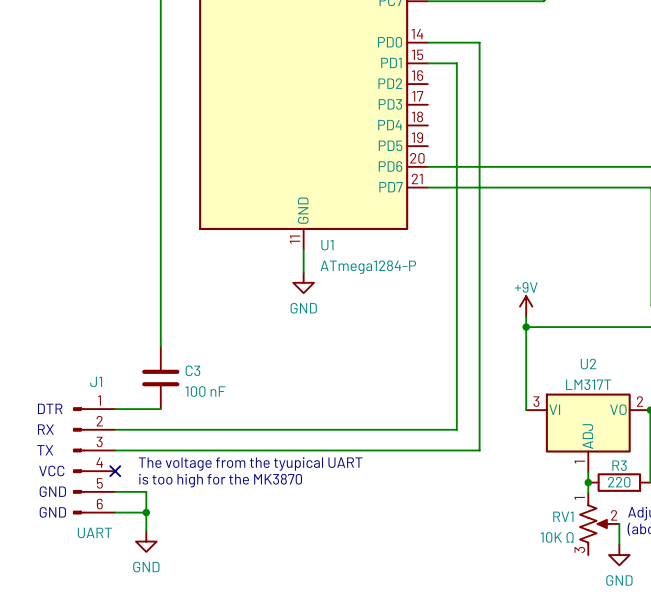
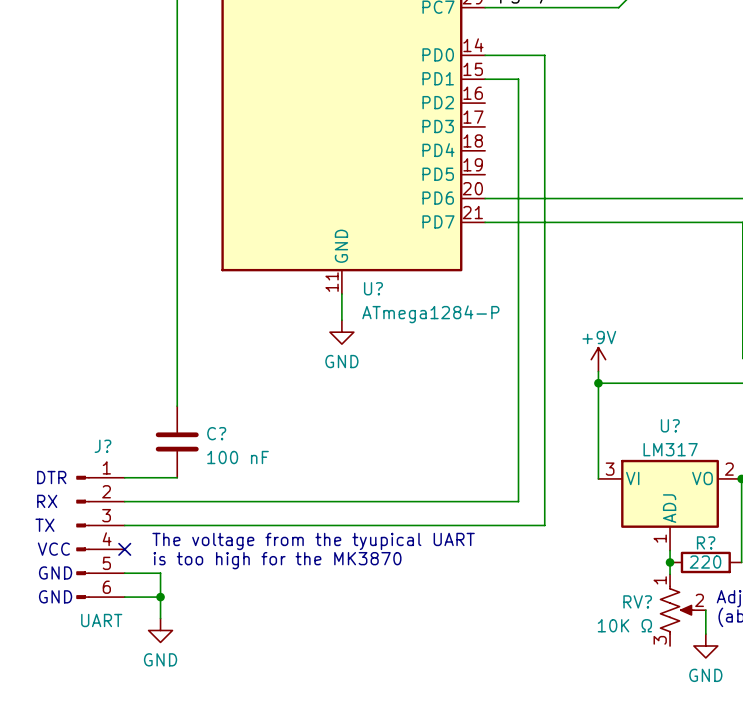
U1 name: U1 (327, 245) -> U? (373, 288)
U2 name: U2 (588, 364) -> U? (670, 425)
C3 name: C3 (192, 370) -> C? (216, 433)
J1 name: J1 (96, 381) -> J? (102, 446)
U2 value: LM317T (588, 384) -> LM317 (670, 449)
R3 name: R3 (619, 465) -> R? (706, 542)
RV1 name: RV1 (563, 516) -> RV? (637, 601)

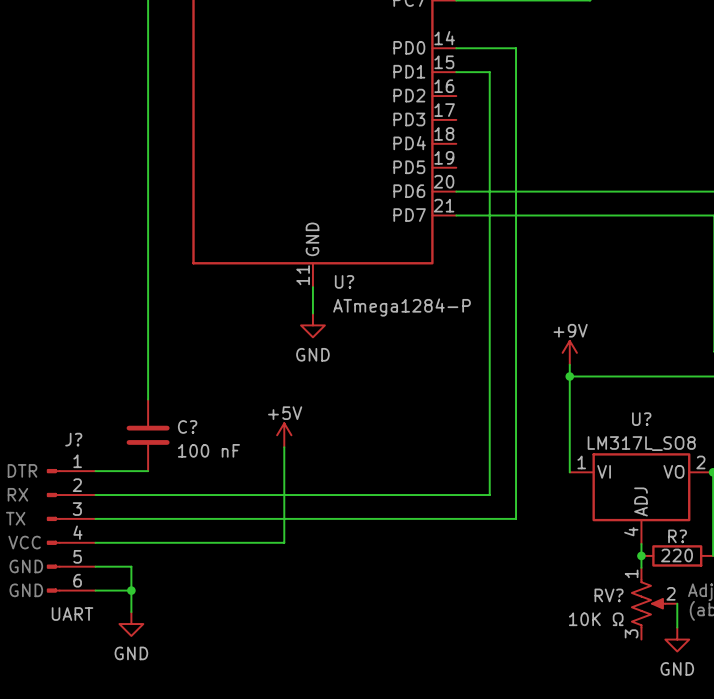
power symbol: none -> +5V (284, 435)
U? value: LM317 (670, 449) -> LM317L_SO8 (641, 443)
wire: none -> (284, 447) (284, 542) (95, 542)
U? pin number: 3 (610, 469) -> 1 (581, 462)
U? pin number: 1 (660, 538) -> 4 (631, 531)
text: The voltage from the tyupical UART (313, 541) -> none
no-connect mark: (124, 549) -> none
text: is too high for the MK3870 (277, 560) -> none

